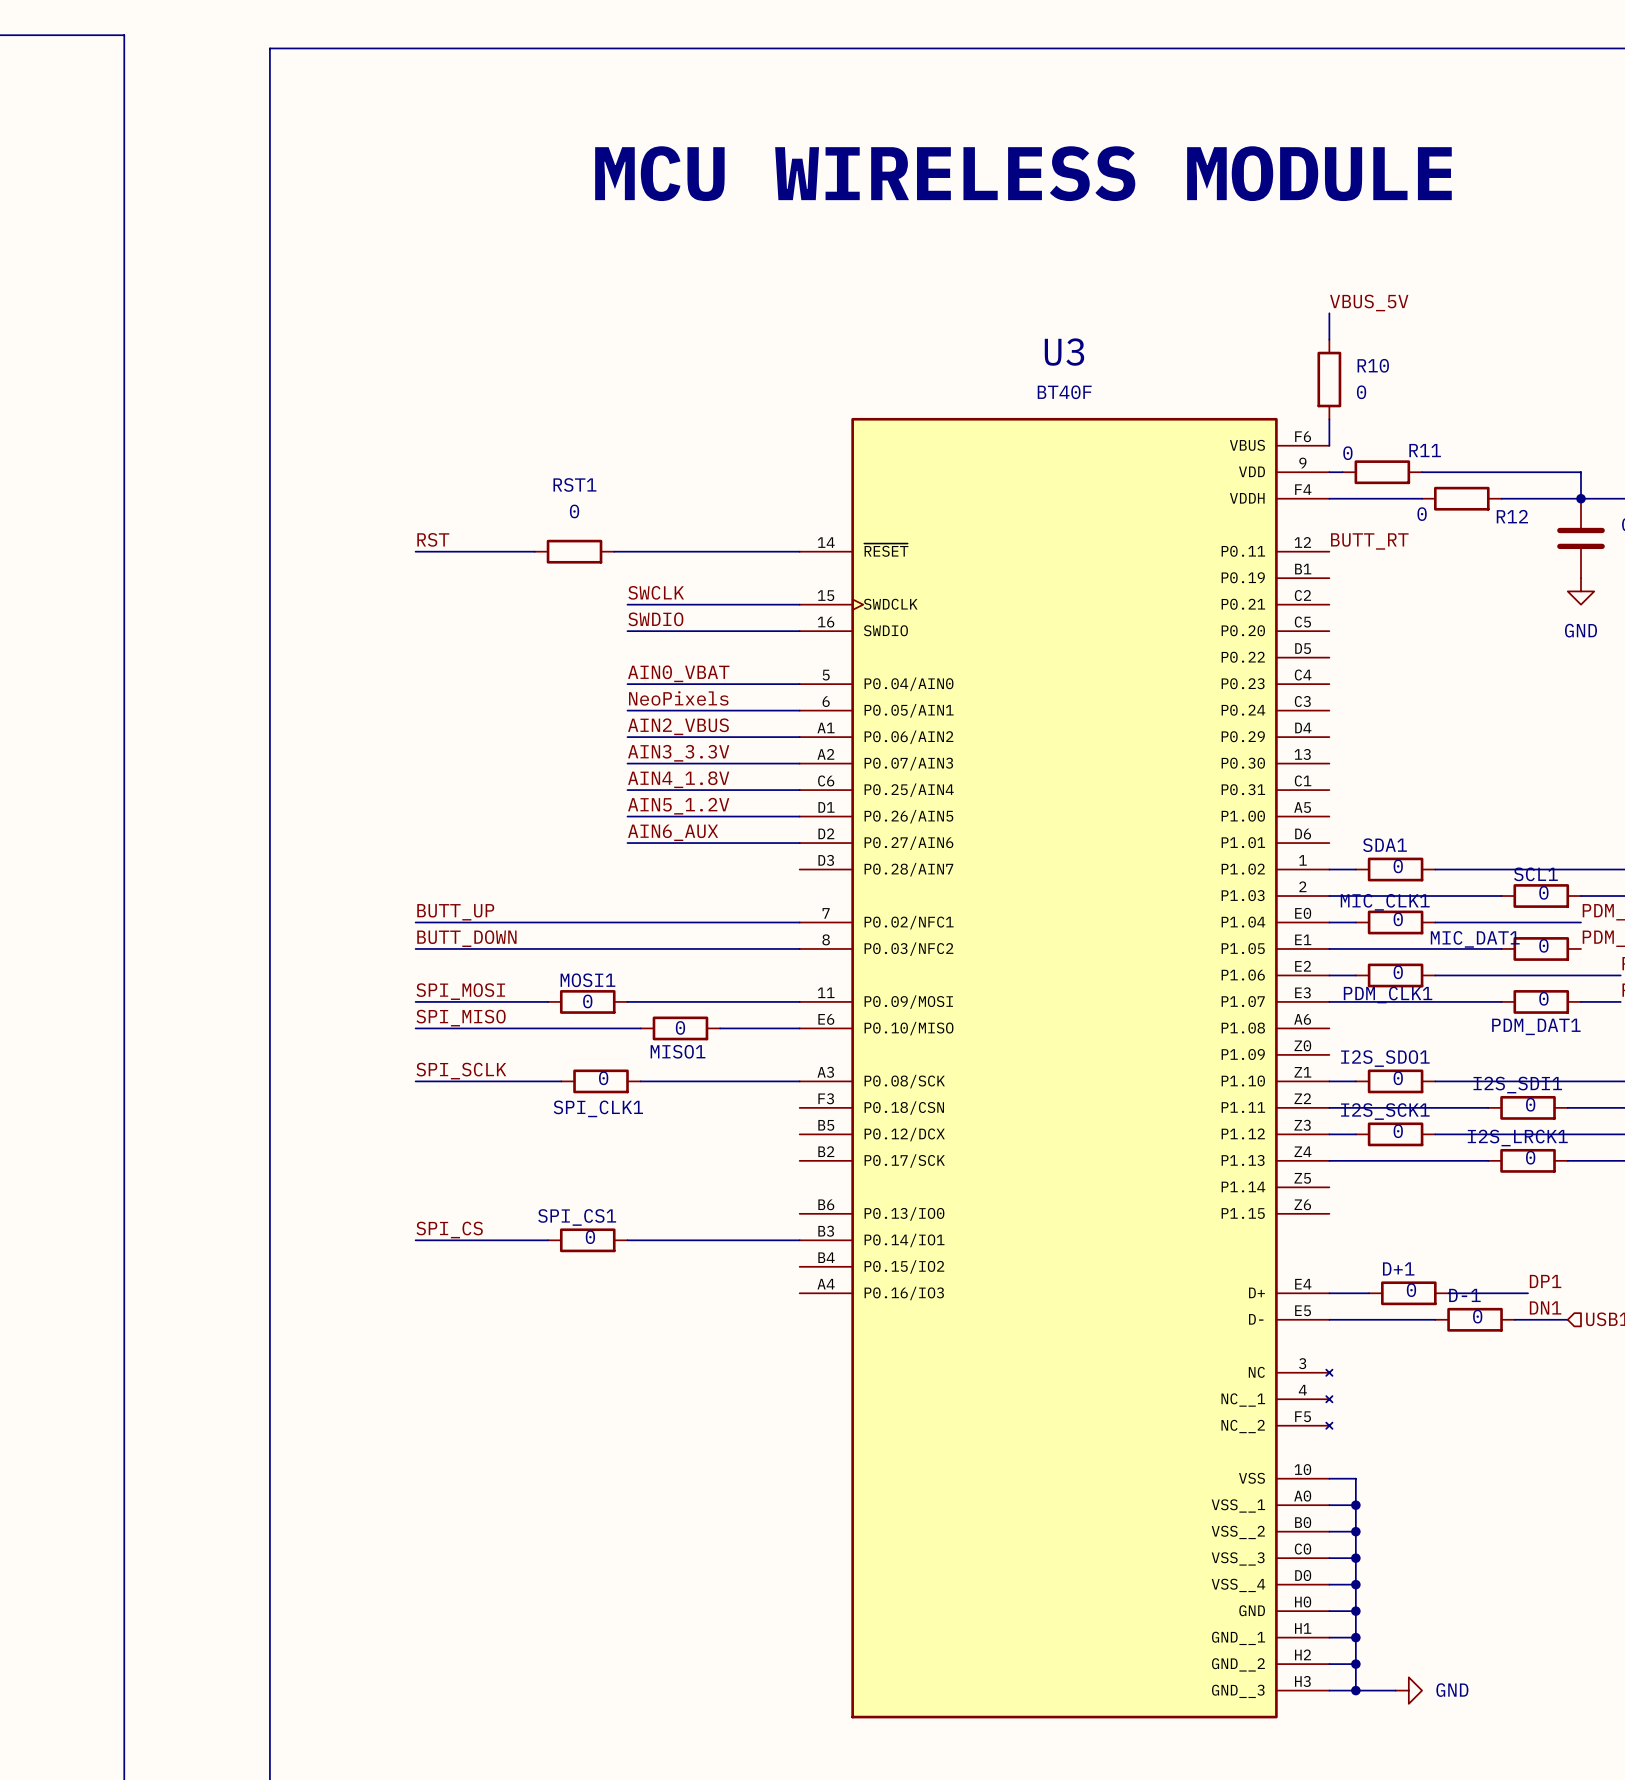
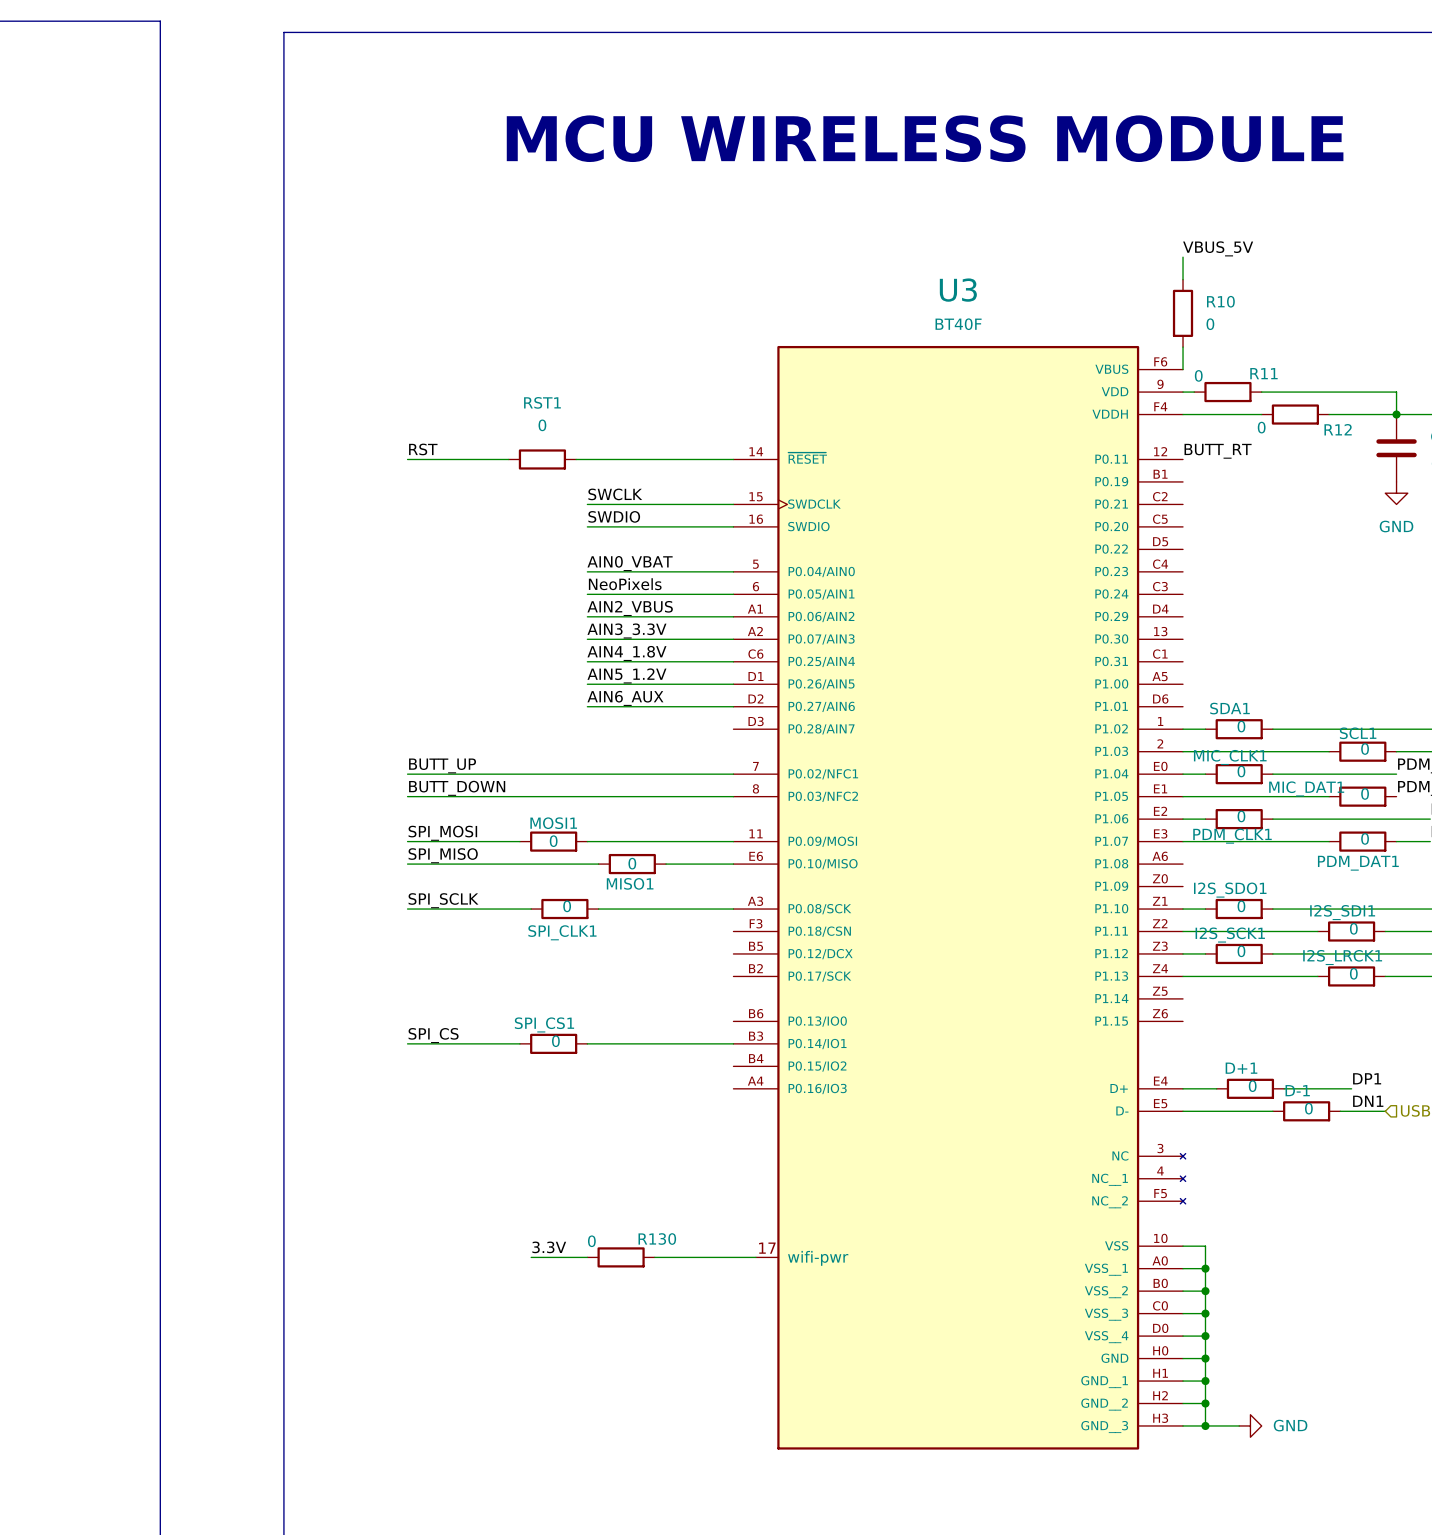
U3 symbol: [799, 417, 1333, 1719] -> [733, 345, 1186, 1450]
label: none -> 3.3V (549, 1247)
wire: none -> (531, 1257) (587, 1257)
R130: none -> 0 (621, 1257)
wire: none -> (654, 1257) (755, 1257)

